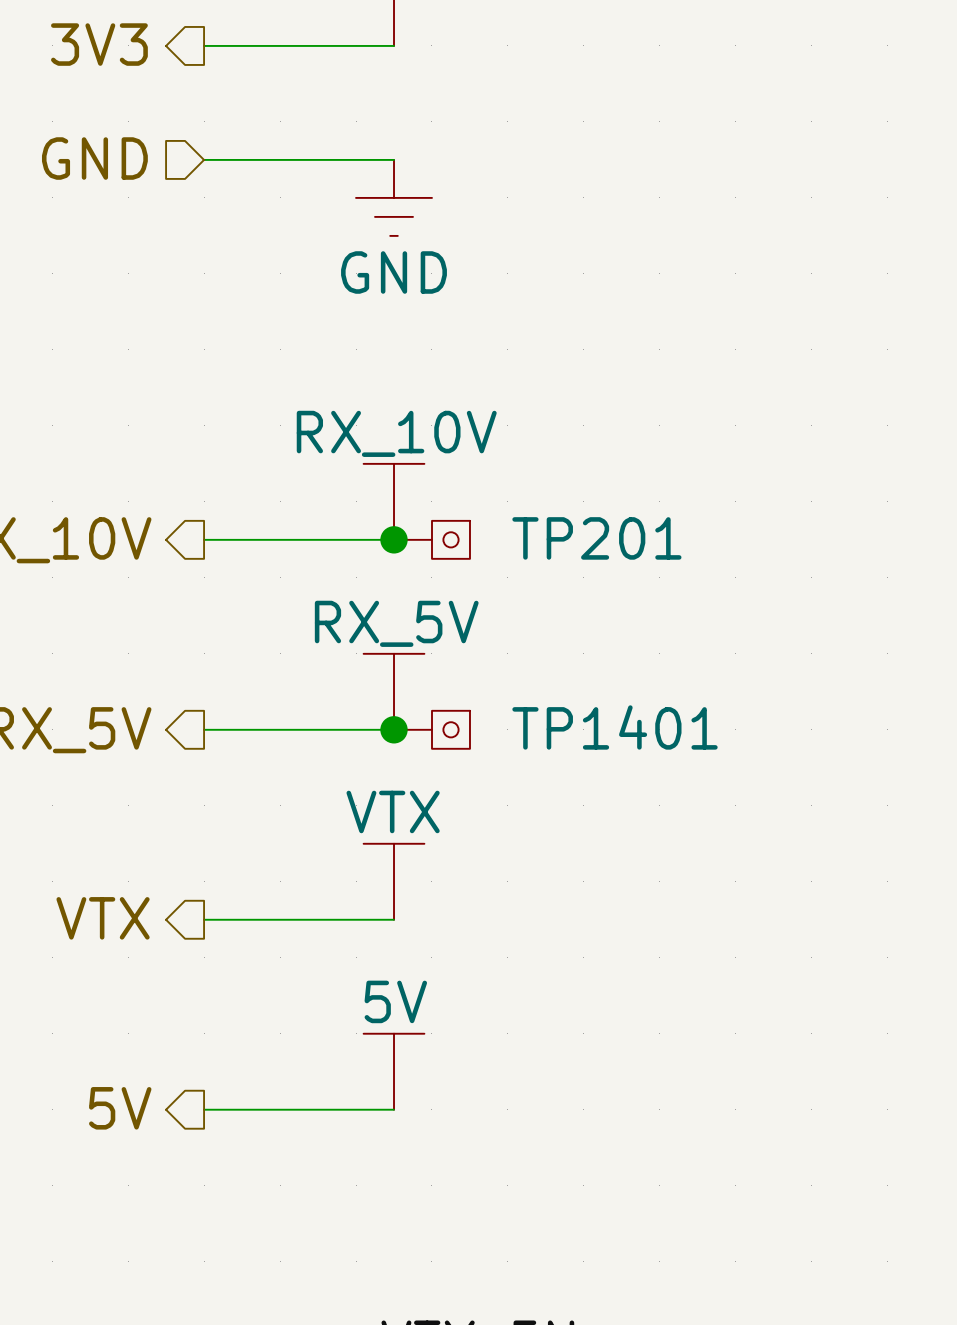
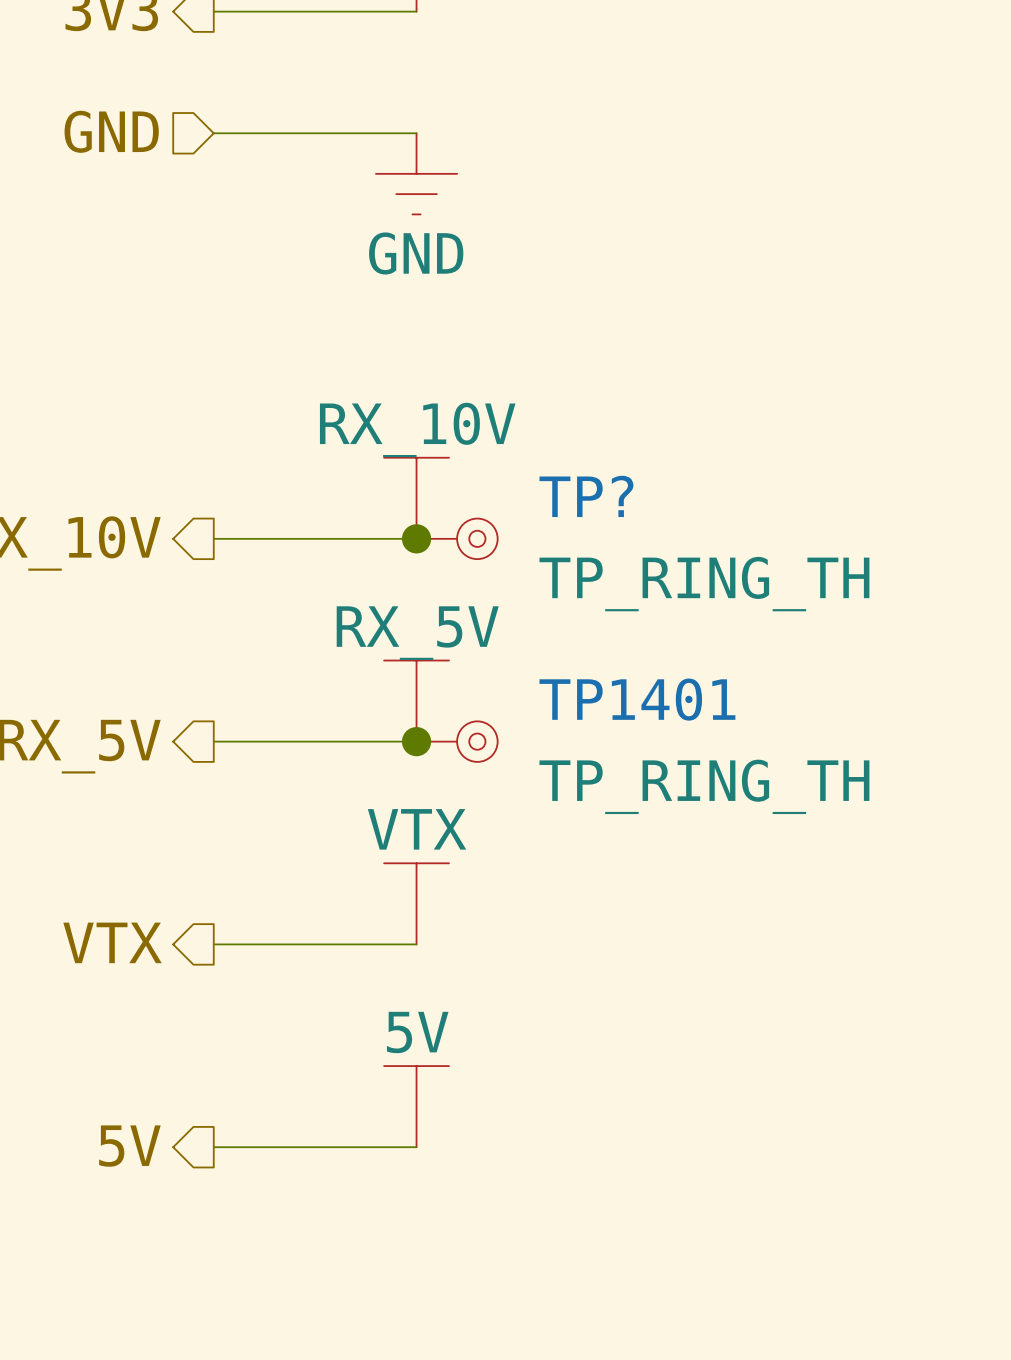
TP201: (431, 539) -> none
TP?: none -> TP_RING_TH (457, 538)
TP1401 symbol: [394, 710, 470, 749] -> [416, 721, 498, 762]
TP1401 name position: TP1401 (615, 727) -> TP1401 (637, 699)
TP1401 value: none -> TP_RING_TH (704, 786)

